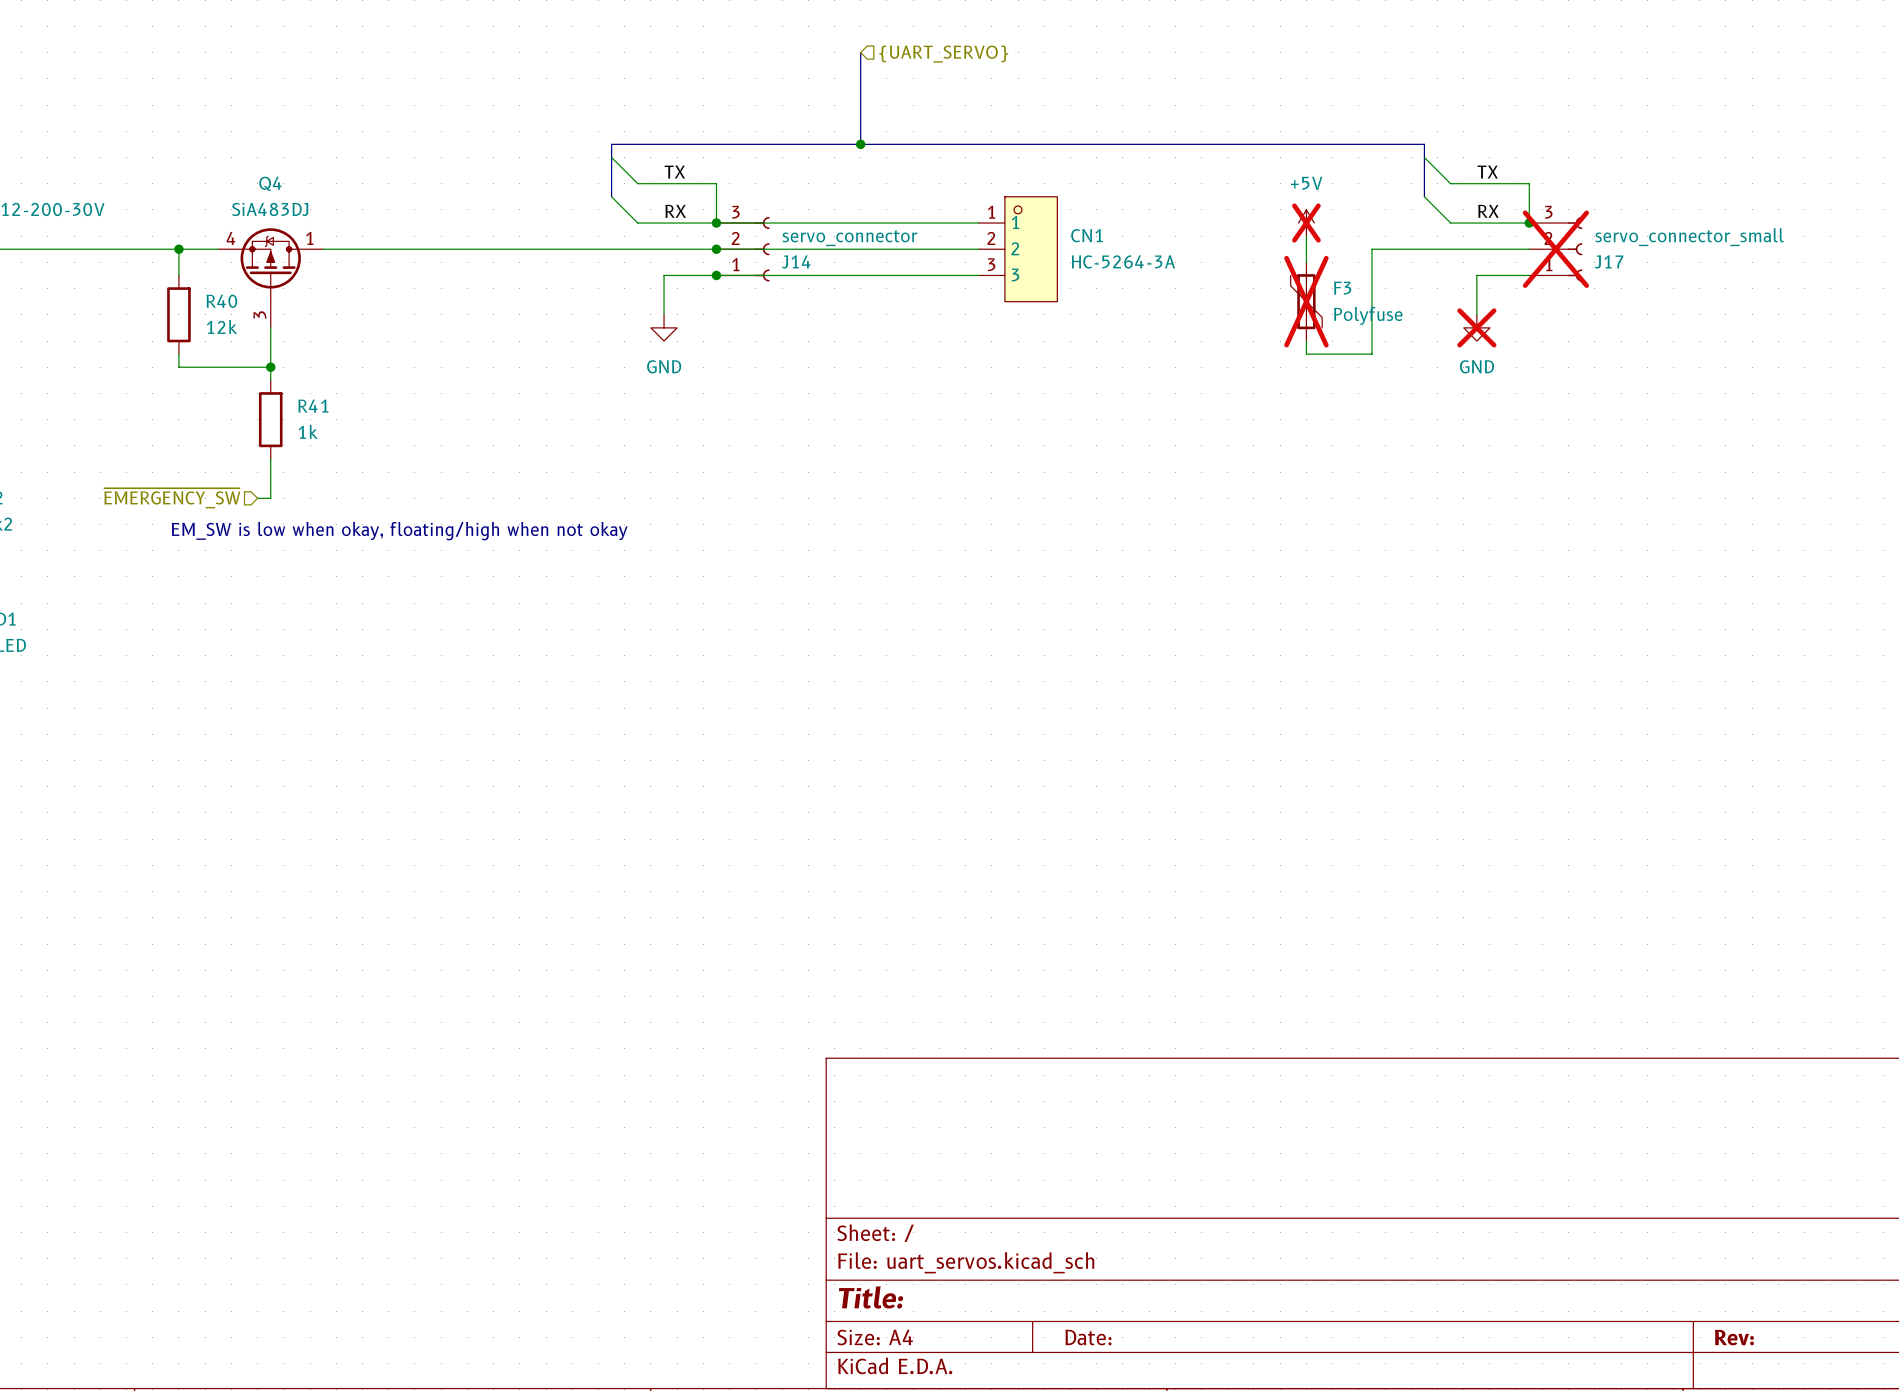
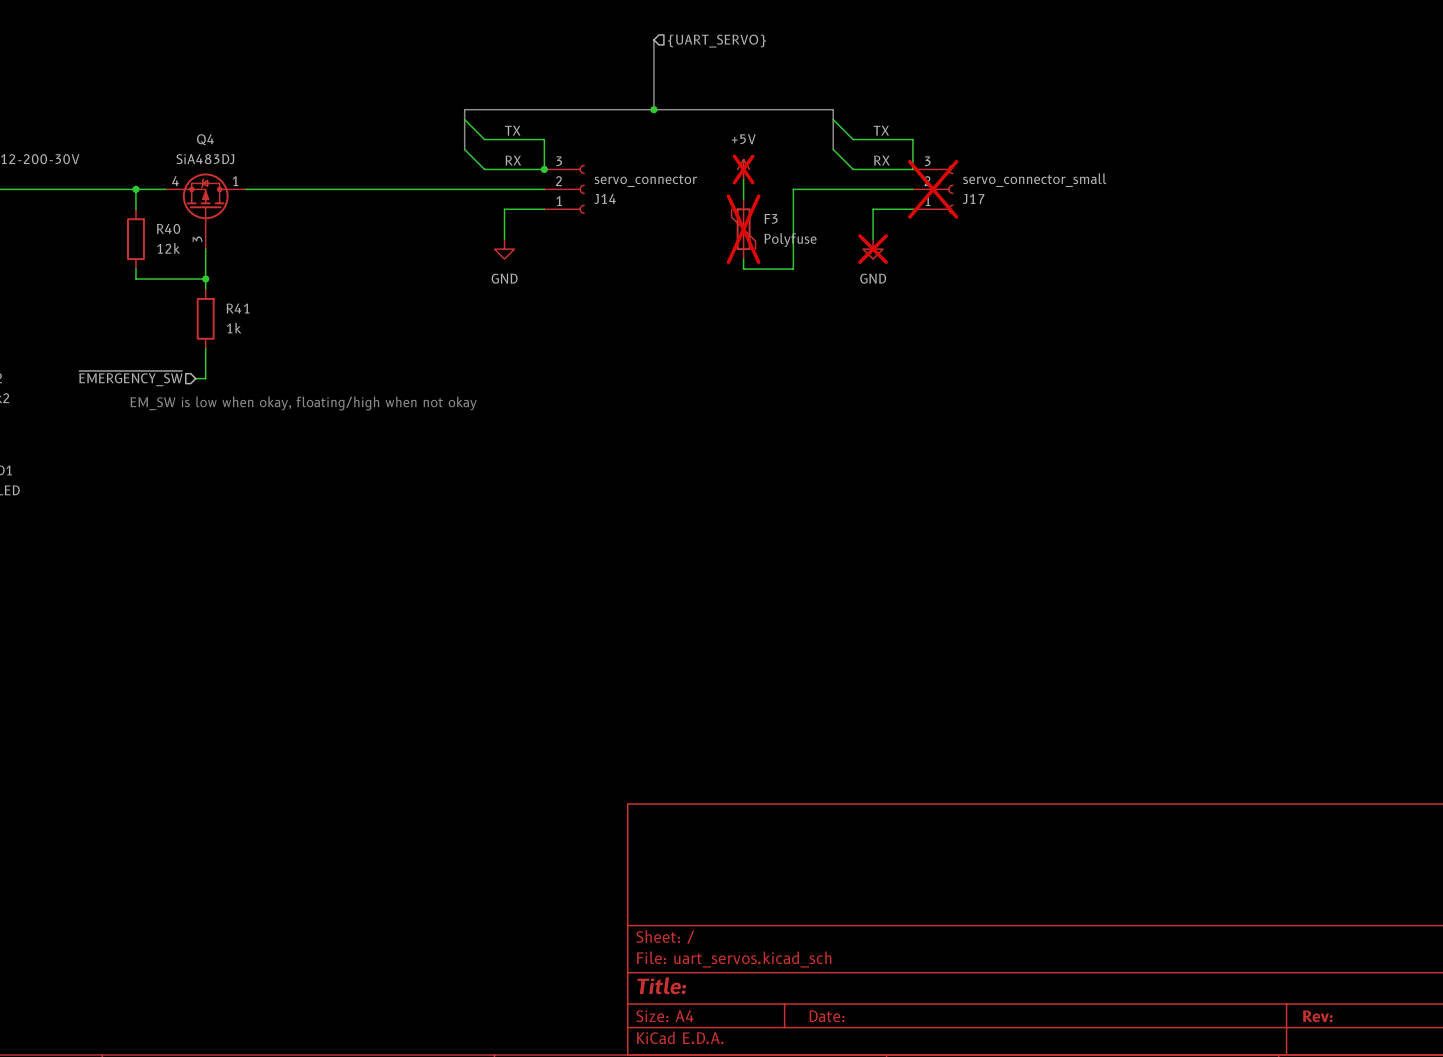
bus: (1096, 144) (1424, 144) (1424, 196) -> (833, 109) (833, 149)
wire: none -> (833, 119) (853, 139) (912, 139) (912, 169) (853, 169) (833, 149)
wire: (1424, 157) (1450, 183) (1529, 183) (1529, 223) (1450, 223) (1424, 196) -> none
label: none -> TX (881, 130)
label: TX (1487, 171) -> none
label: none -> RX (881, 160)
label: RX (1488, 211) -> none
wire: (716, 223) (978, 223) -> none
power symbol: none -> +5V (743, 169)
power symbol: +5V (1306, 223) -> none
junction: (1529, 223) -> none
wire: none -> (743, 179) (743, 199)
wire: (1306, 236) (1306, 262) -> none
wire: (716, 249) (978, 249) -> none
junction: (716, 249) -> none
CN1: HC-5264-3A (1018, 249) -> none
wire: none -> (912, 189) (793, 189) (793, 269) (743, 269) (743, 259)
wire: (1529, 249) (1371, 249) (1371, 354) (1306, 354) (1306, 341) -> none
J17 position: (1555, 249) -> (933, 189)
wire: (716, 275) (978, 275) -> none
junction: (716, 275) -> none
wire: none -> (912, 209) (873, 209) (873, 239)
wire: (1529, 275) (1476, 275) (1476, 314) -> none
F3 position: (1306, 301) -> (743, 229)
power symbol: none -> GND (873, 249)
power symbol: GND (1476, 327) -> none

